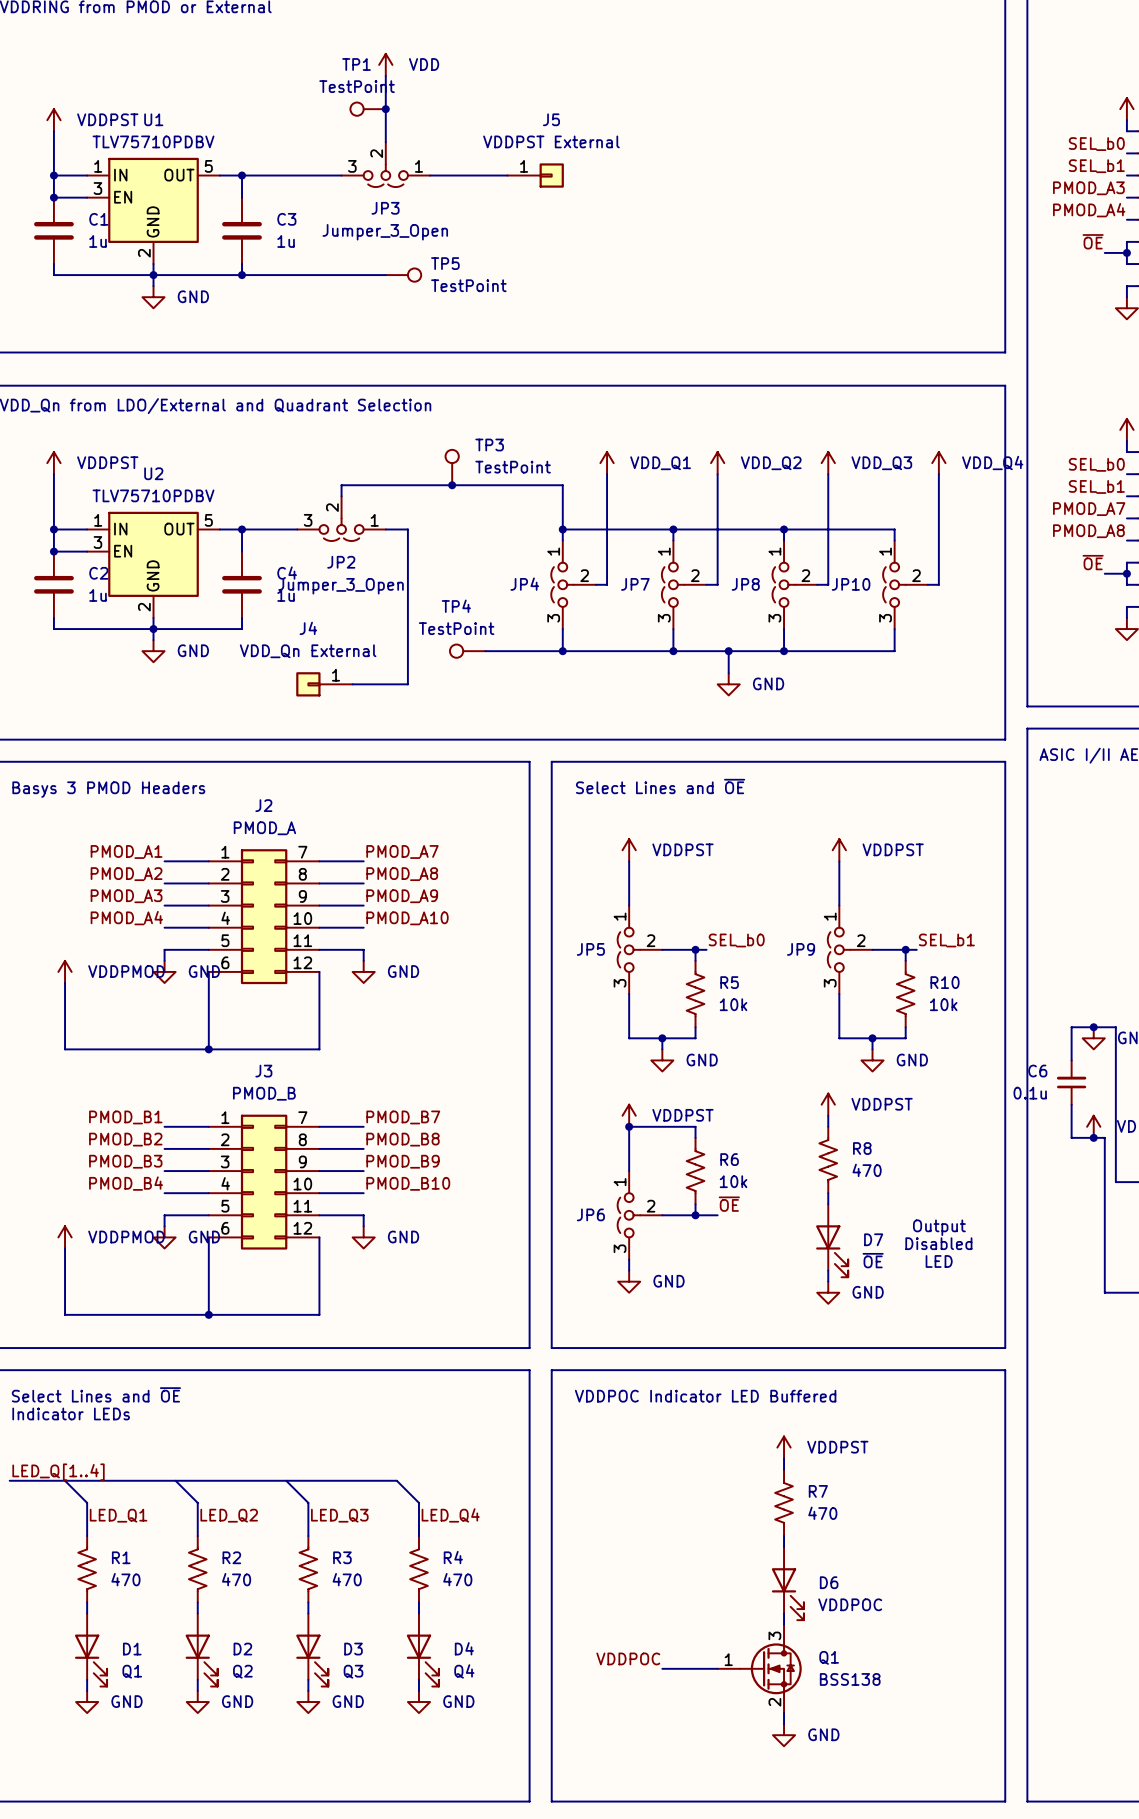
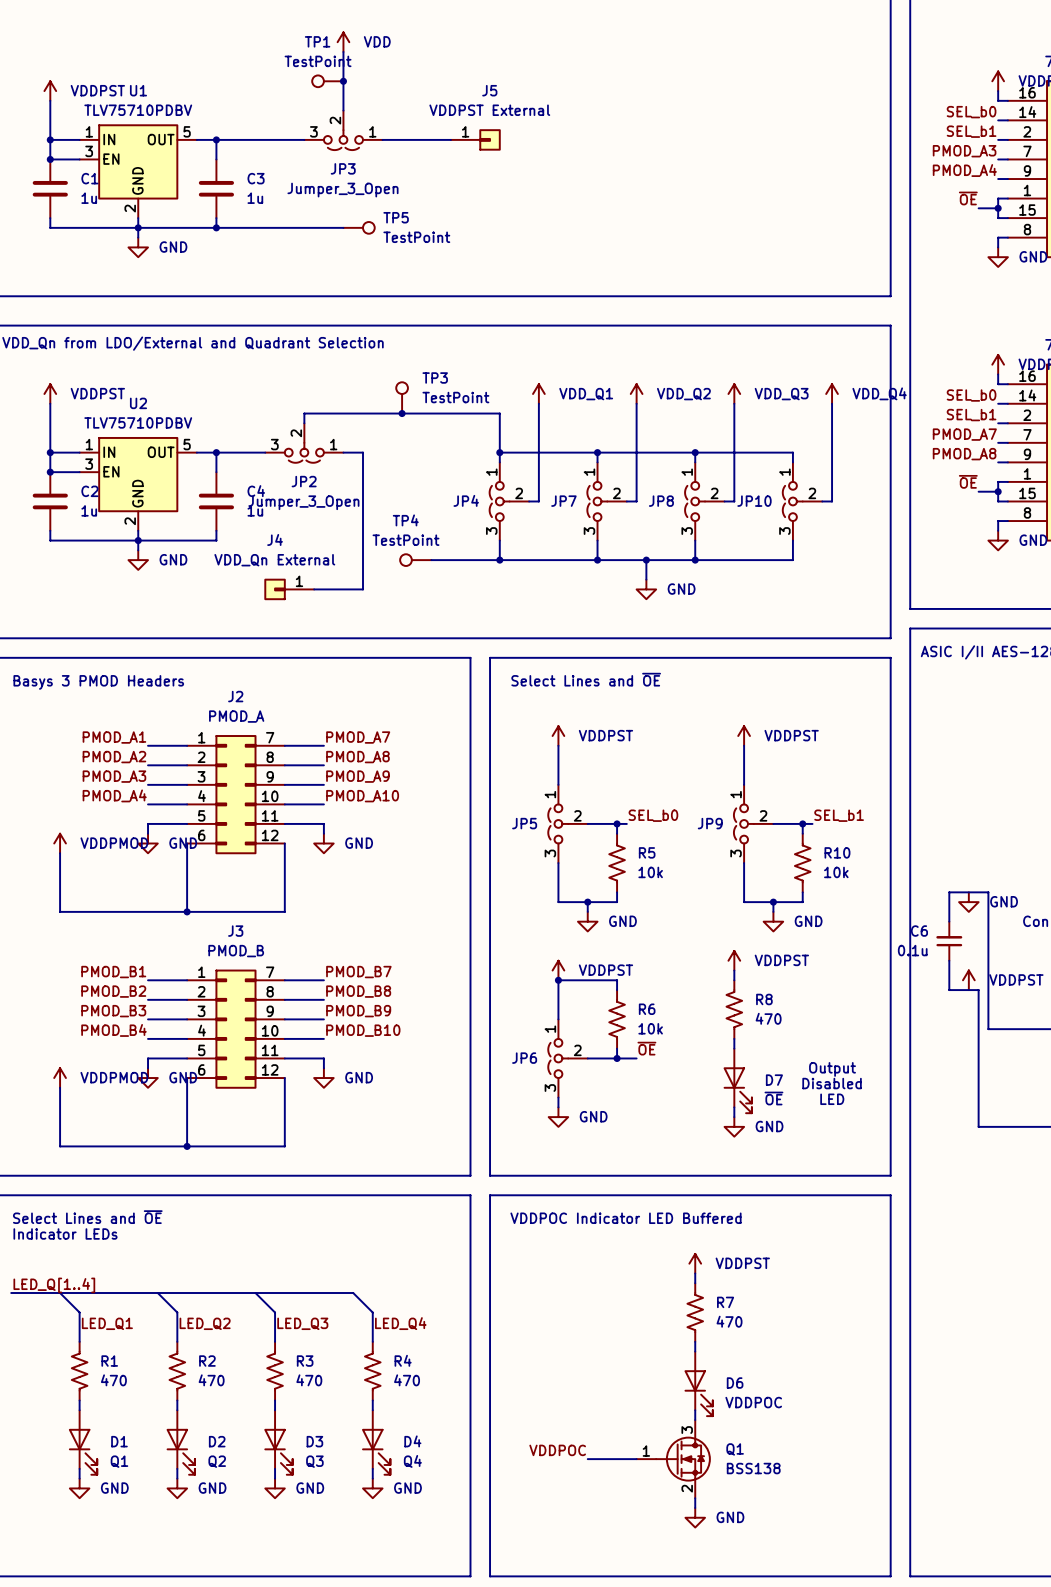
junction: (1093, 1027) -> none
junction: (1093, 1137) -> none

